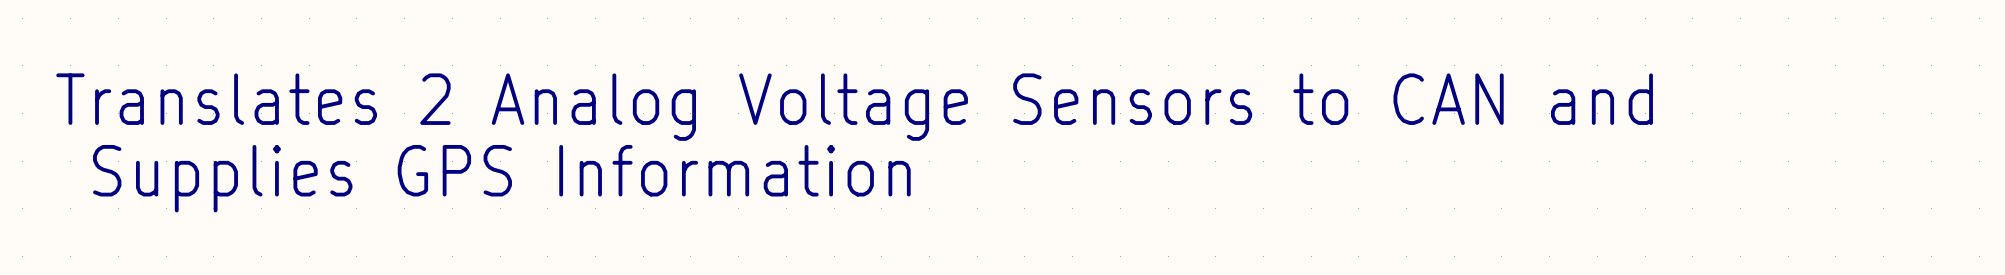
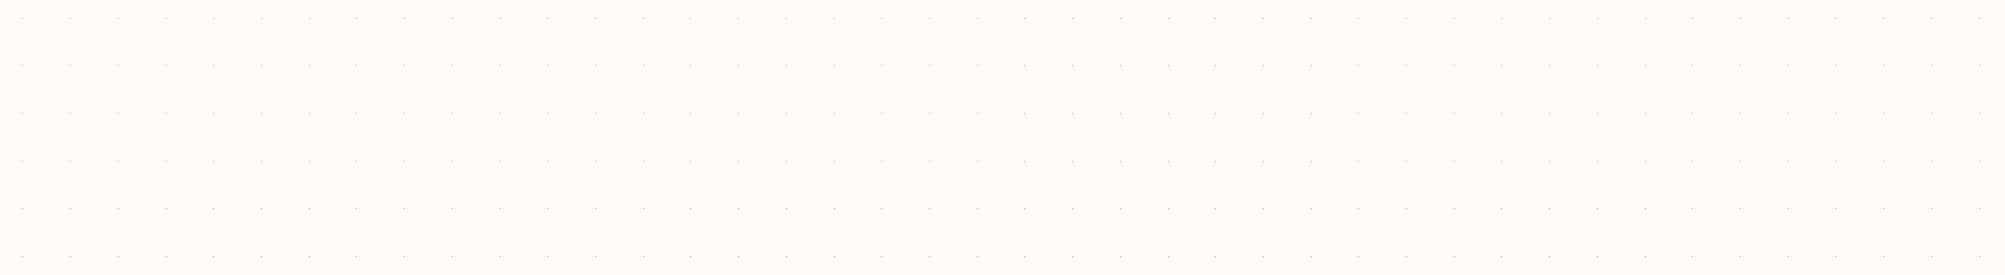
text: Translates 2 Analog Voltage Sensors to CAN and (854, 107) -> none
text: Supplies GPS Information (501, 178) -> none

